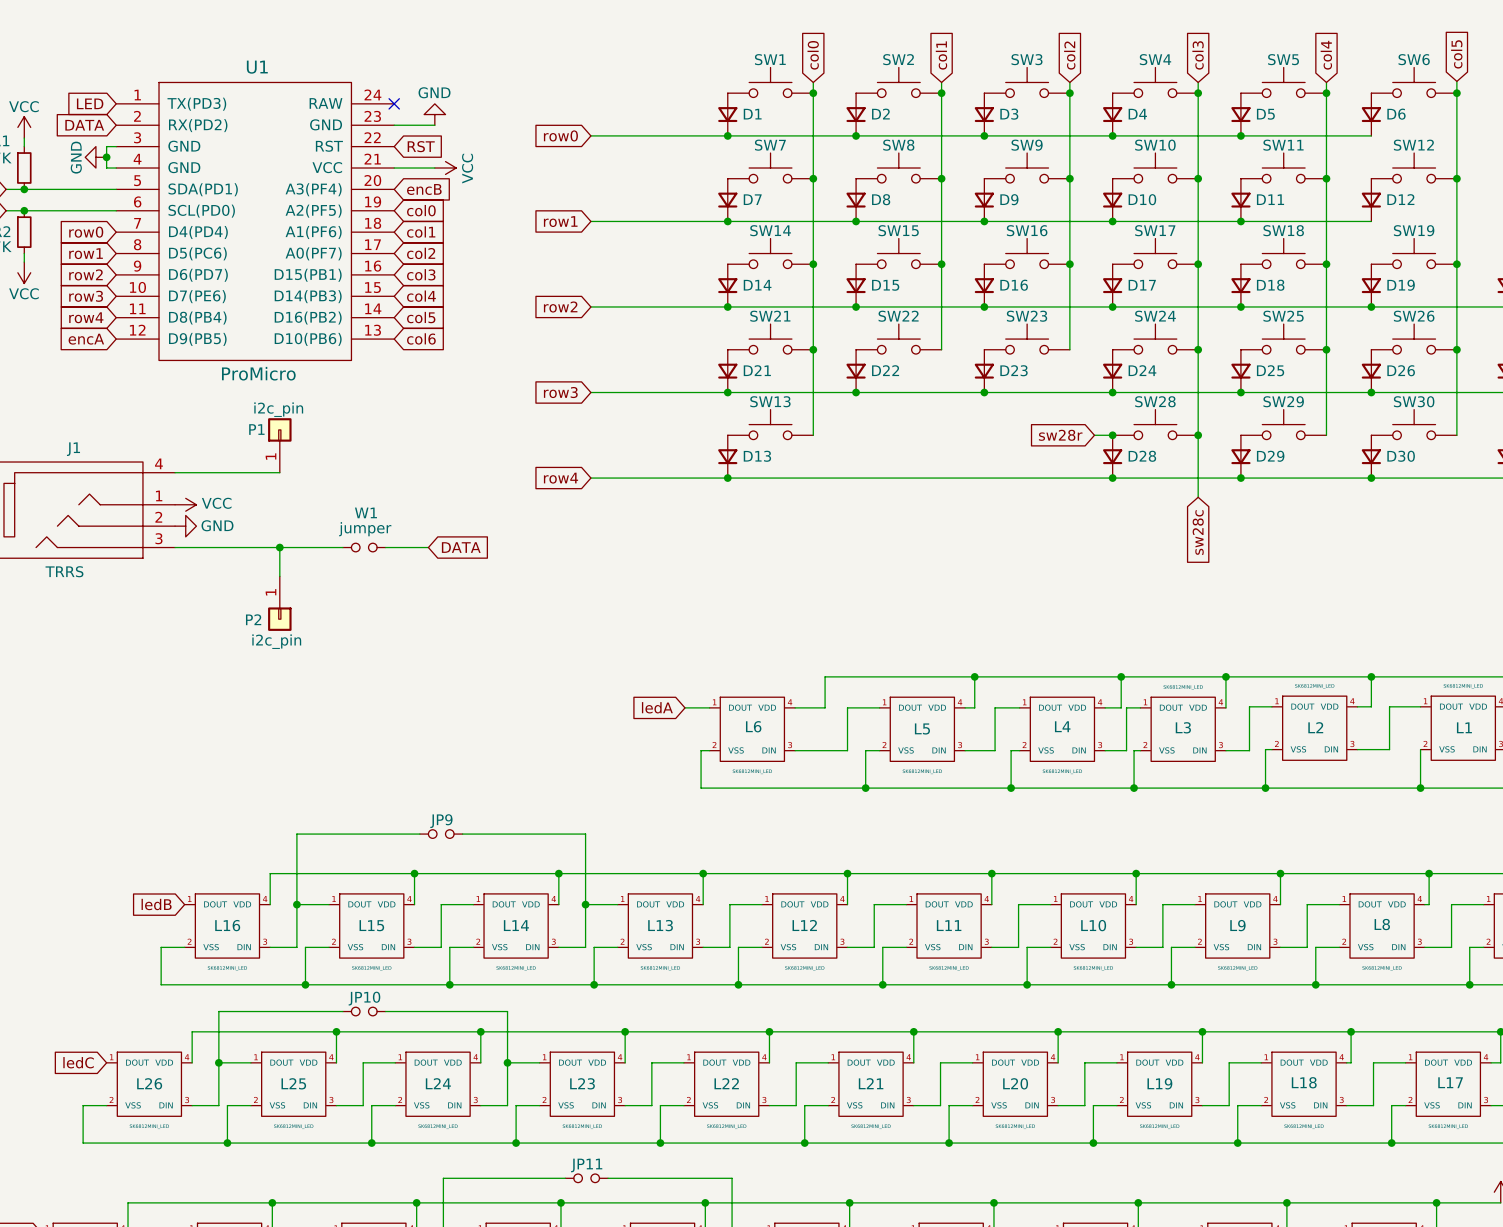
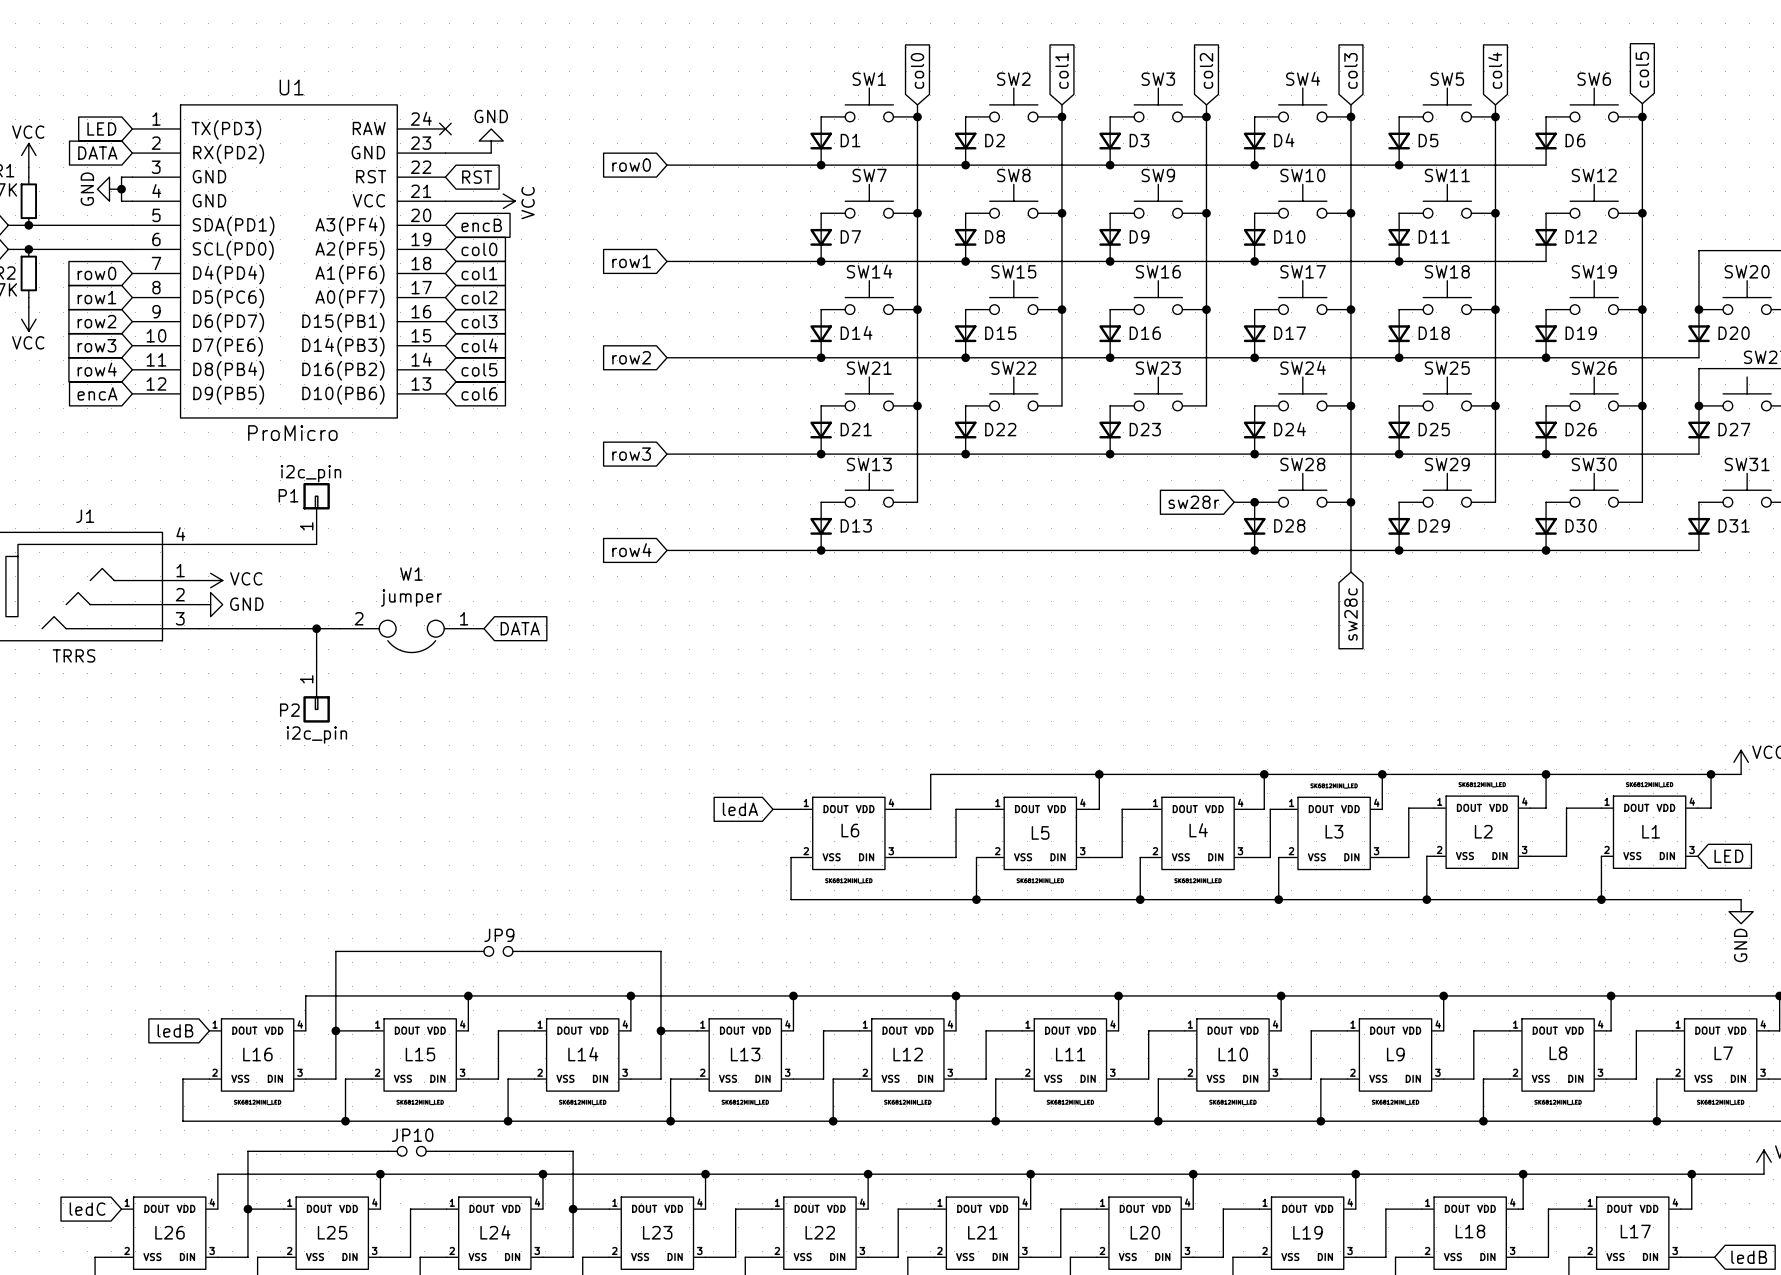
W1 name position: W1 (365, 512) -> W1 (411, 574)
W1 symbol: [342, 543, 386, 552] -> [339, 620, 484, 653]

